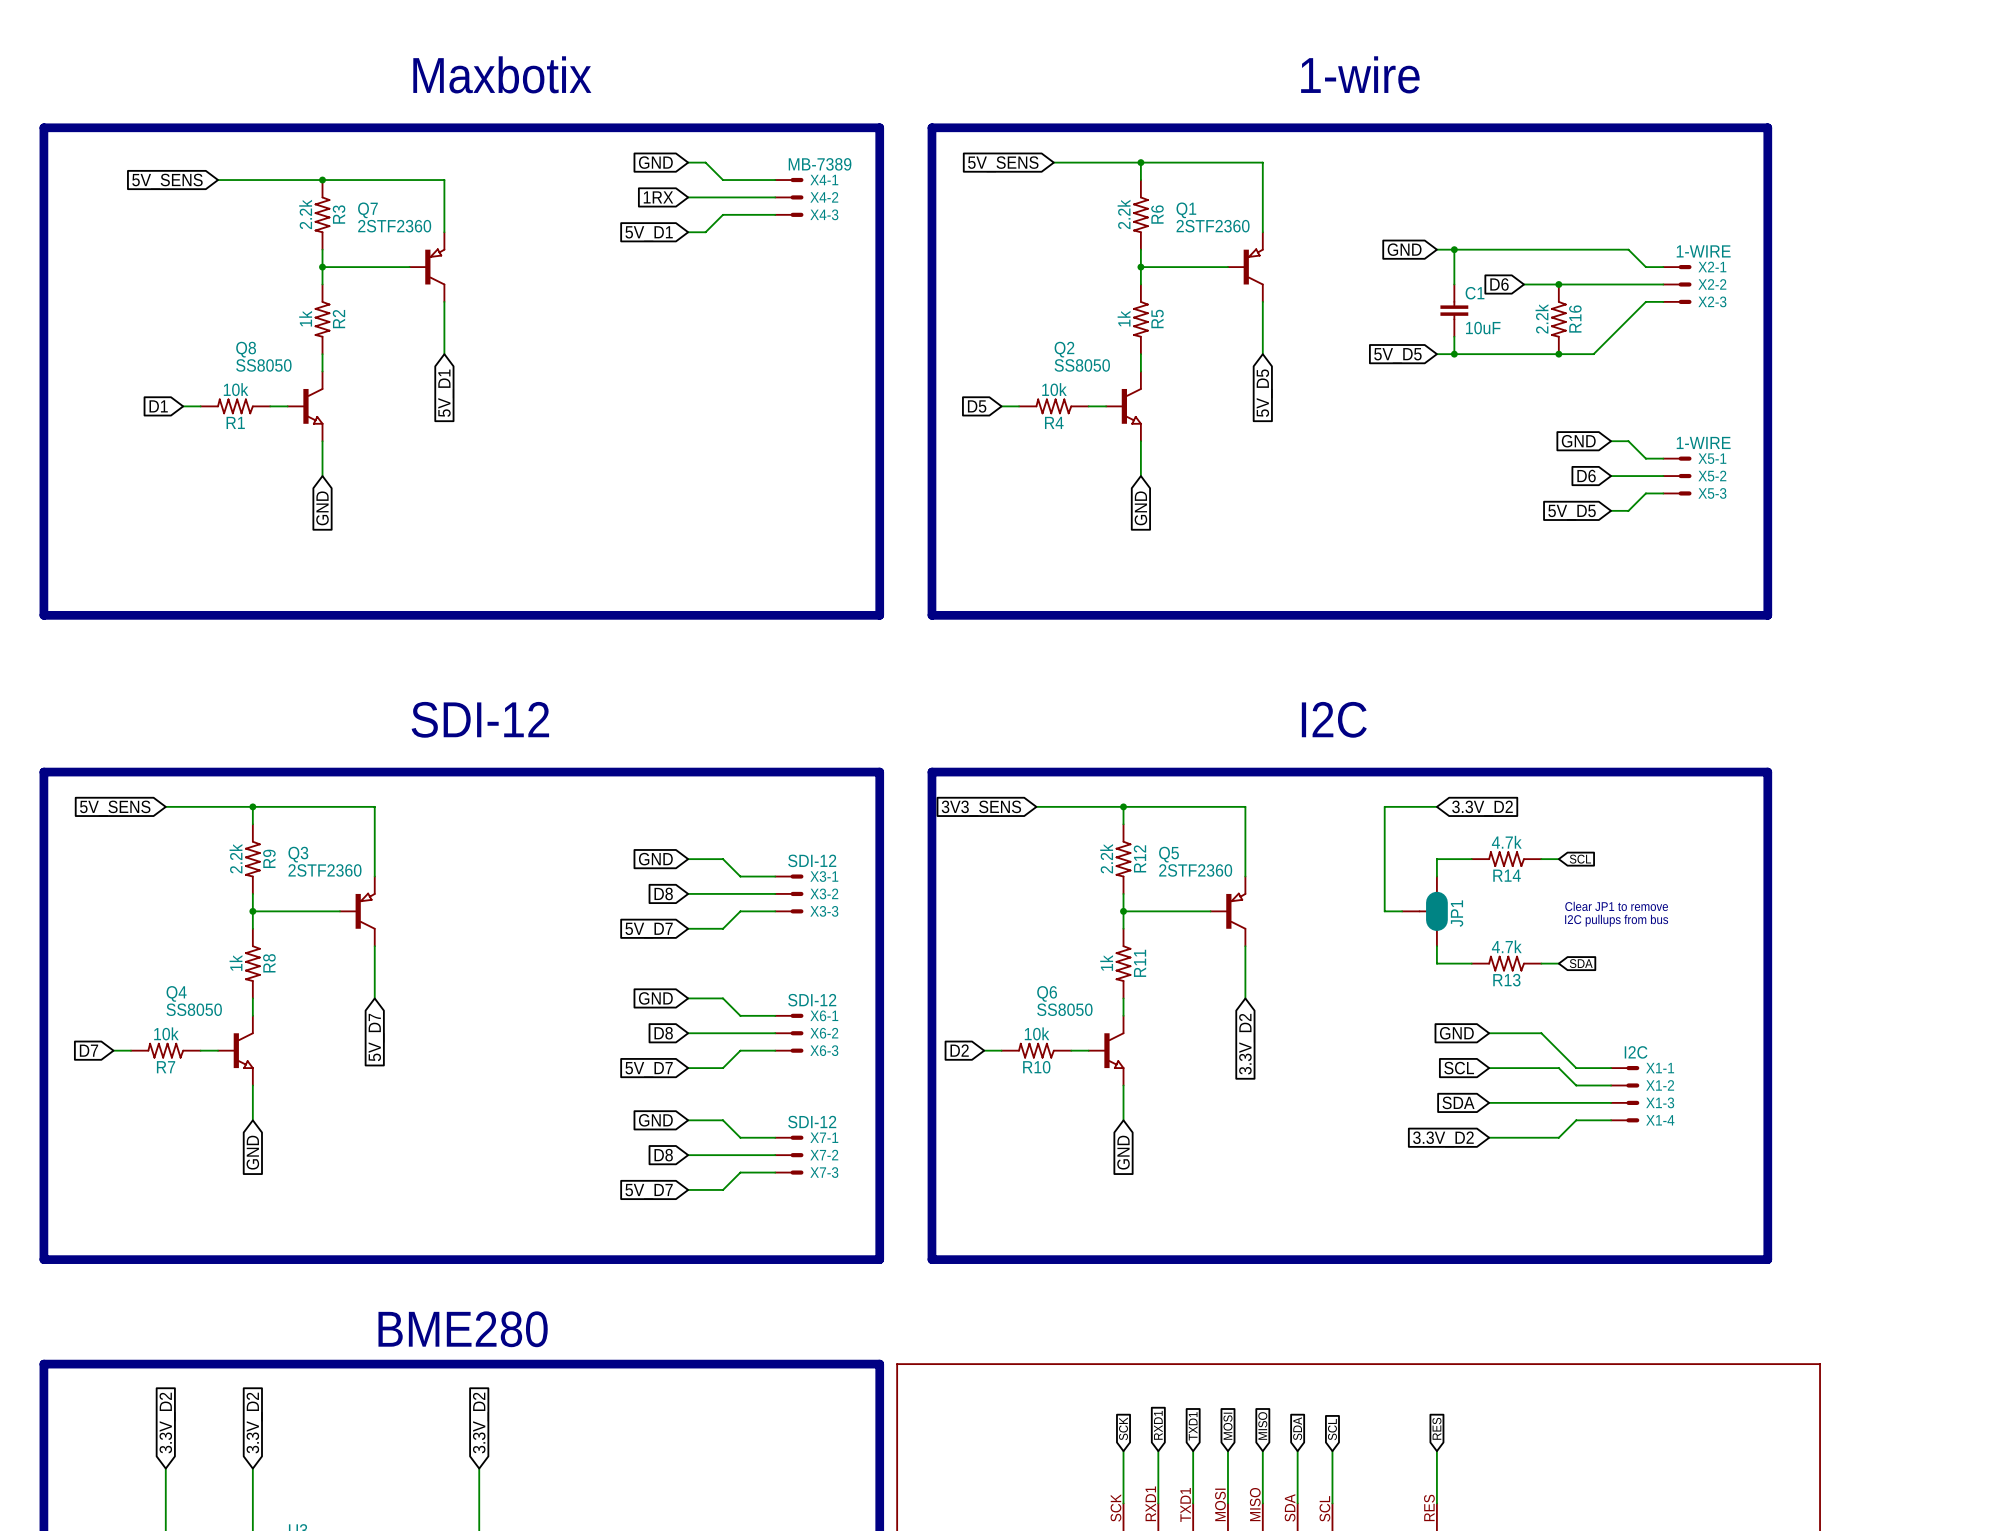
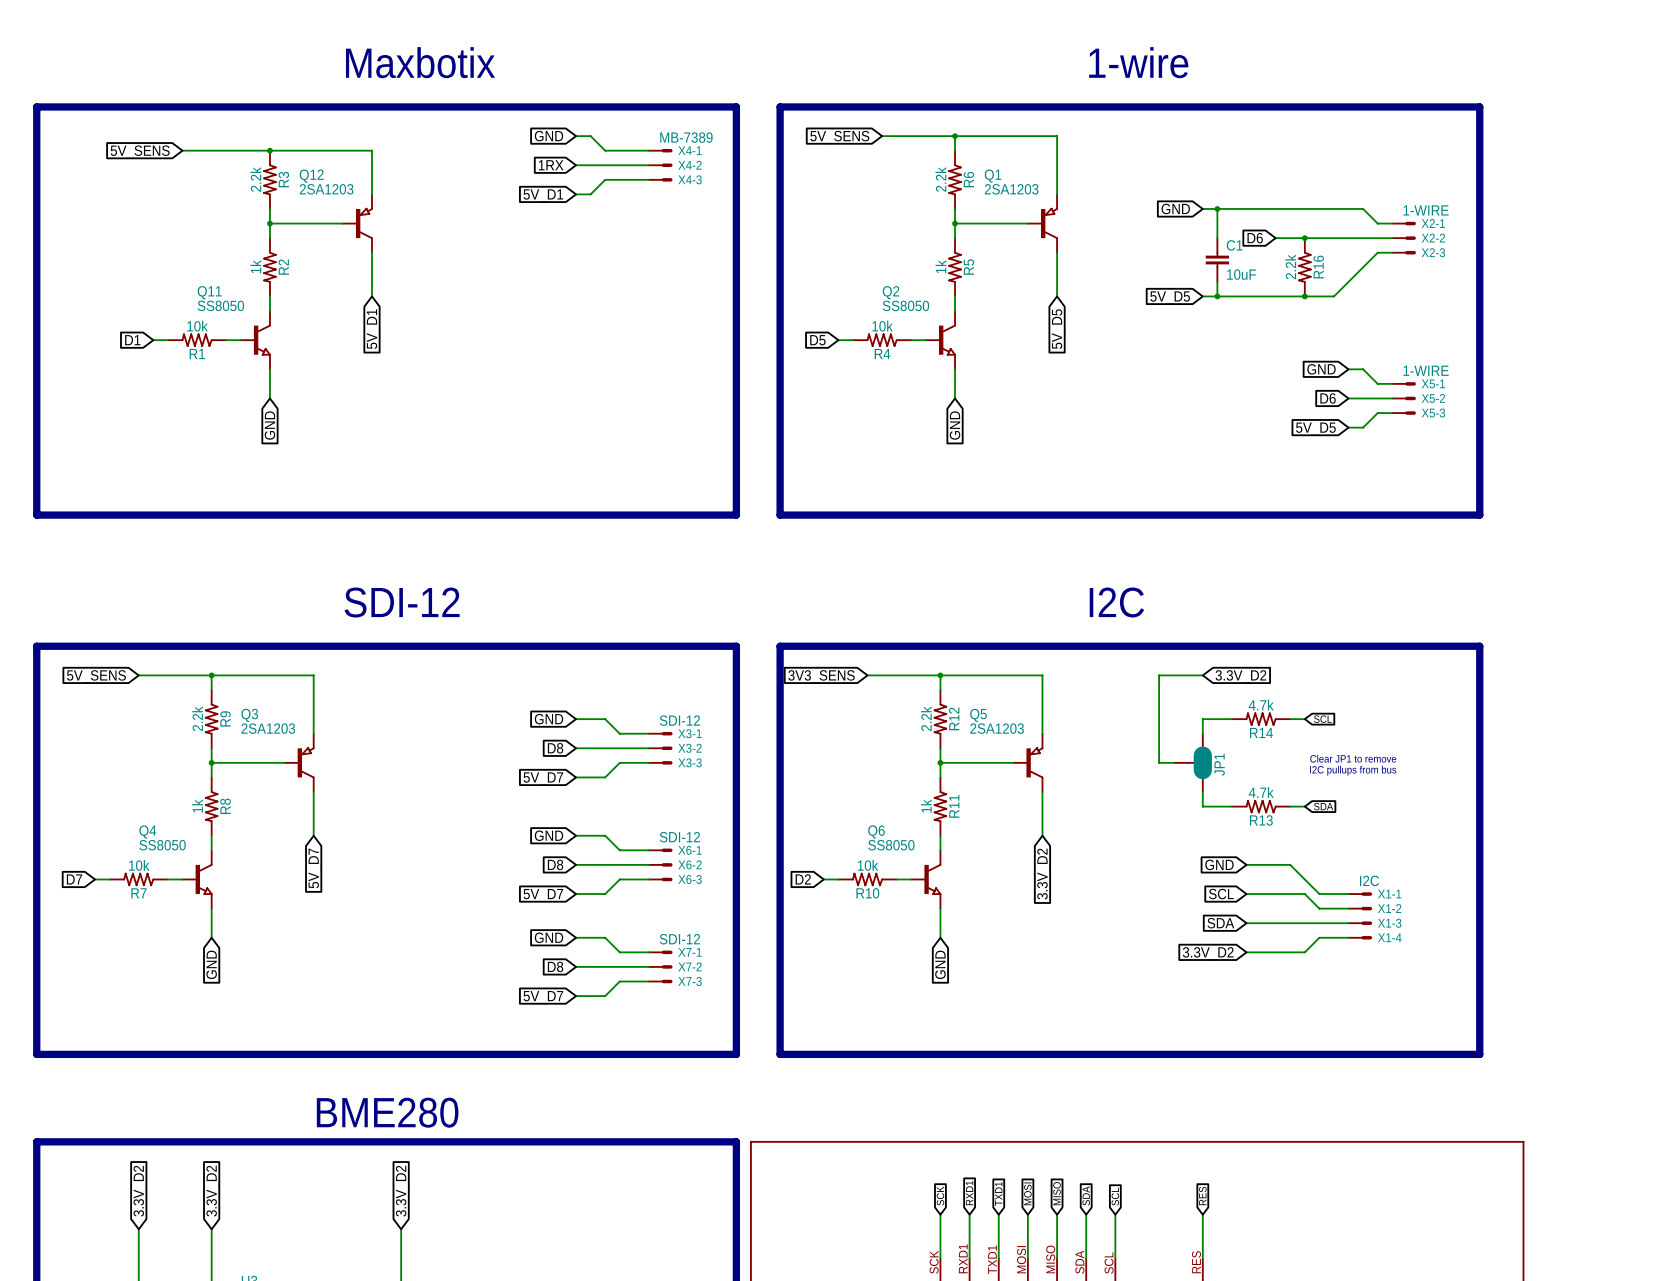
Q7 name: Q7 (367, 210) -> Q12 (311, 176)
Q7 value: 2STF2360 (394, 226) -> 2SA1203 (326, 189)
Q1 value: 2STF2360 (1213, 226) -> 2SA1203 (1011, 189)
Q8 name: Q8 (246, 349) -> Q11 (209, 292)
Q3 value: 2STF2360 (325, 870) -> 2SA1203 (268, 728)
Q5 value: 2STF2360 (1195, 870) -> 2SA1203 (997, 728)

